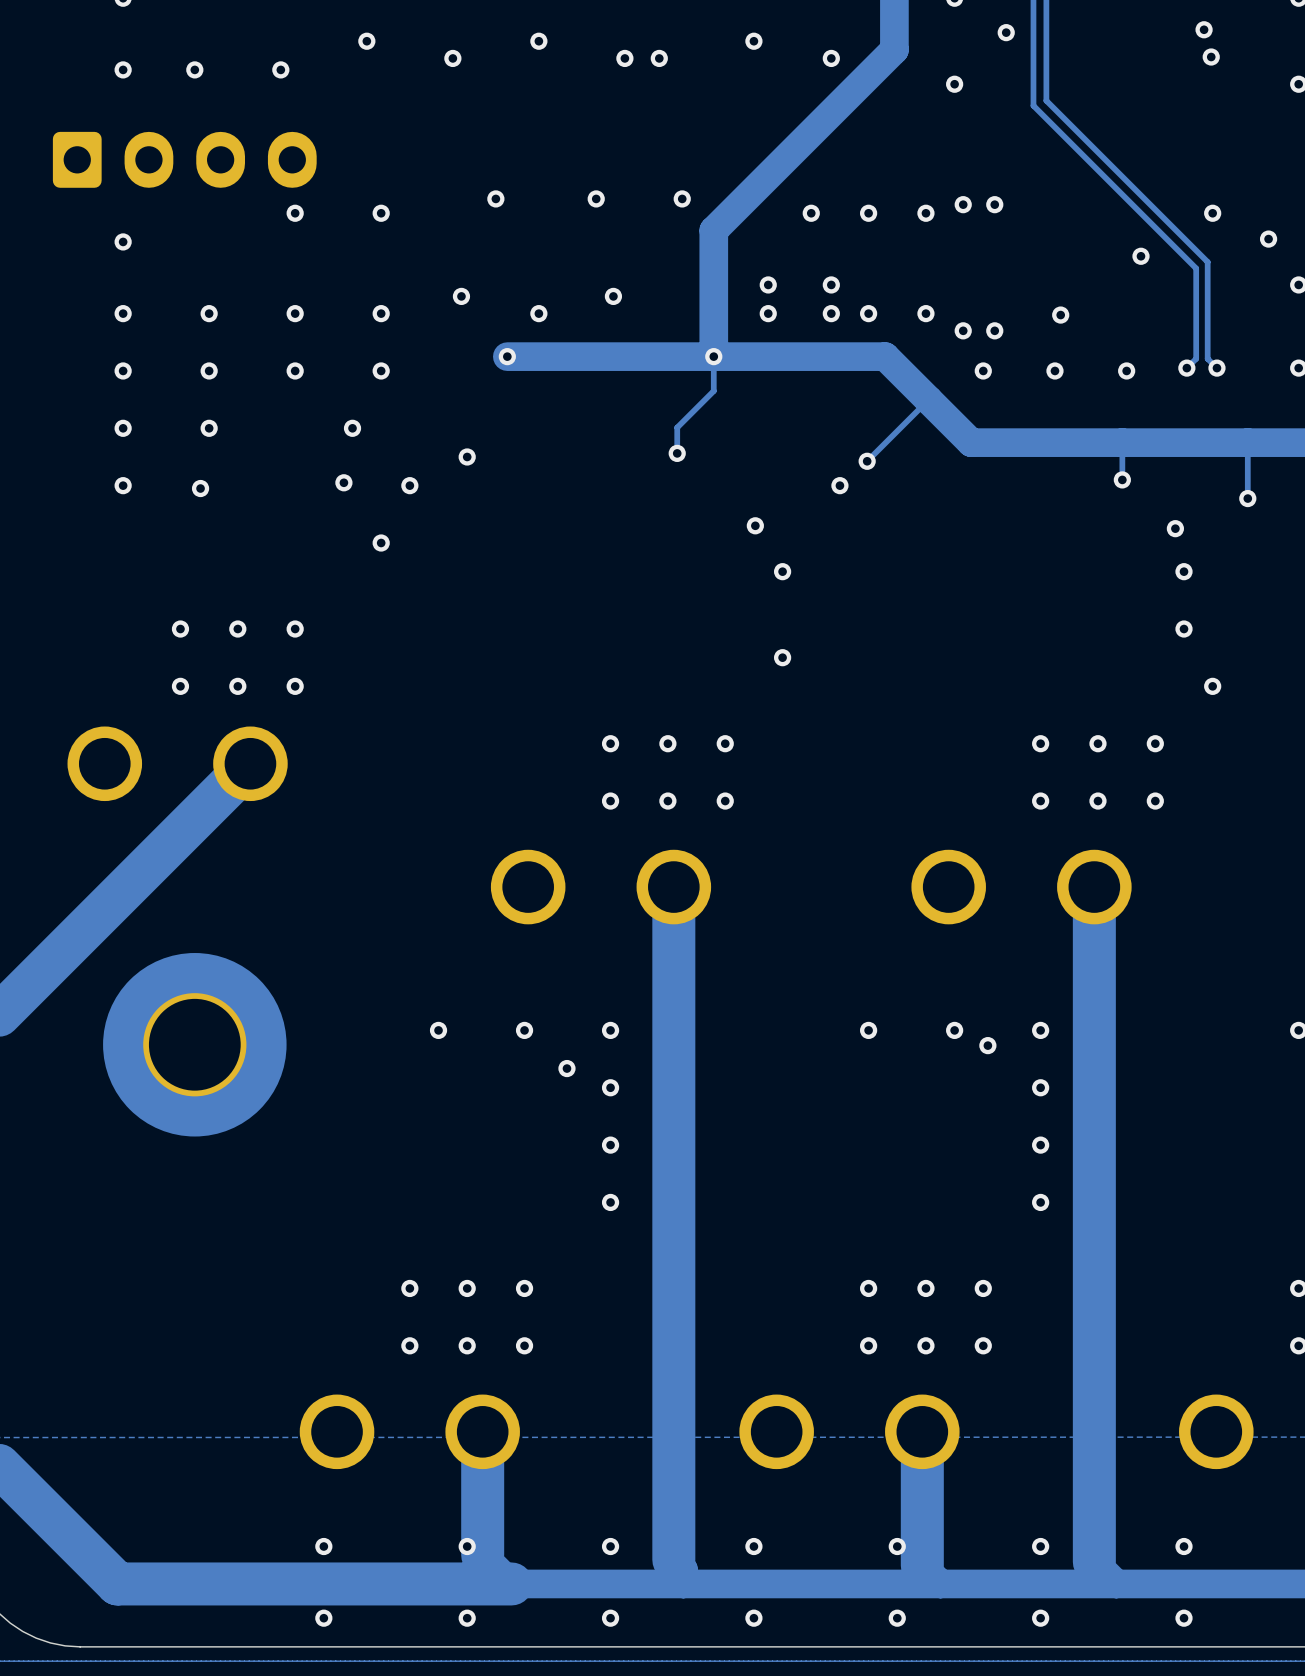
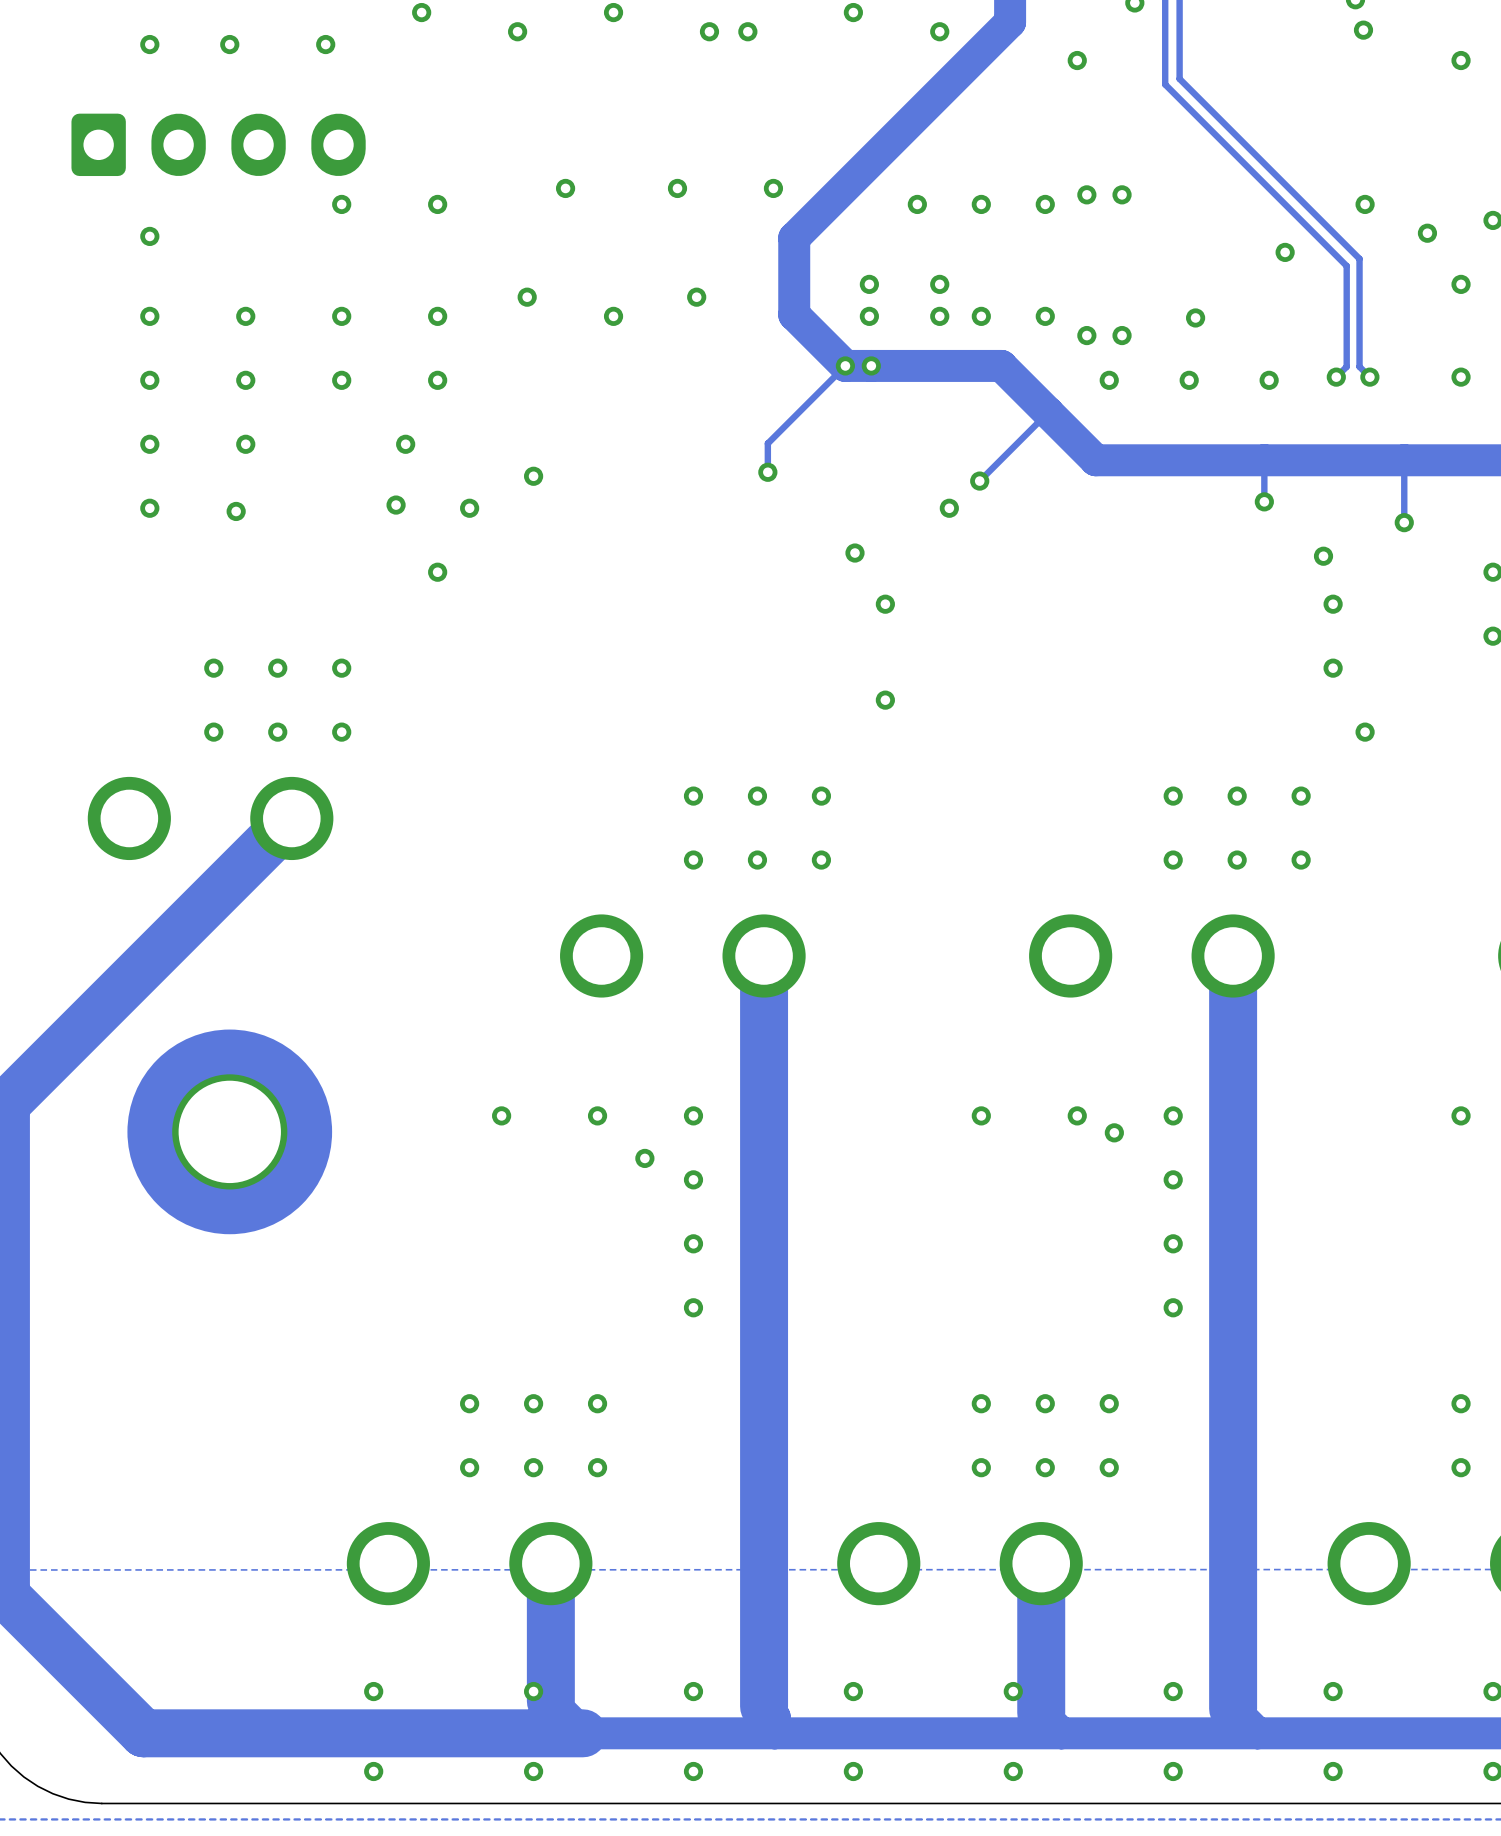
track: (713, 230) (713, 391) -> (808, 223) (794, 238) (794, 314) (845, 365)
track: (507, 356) (886, 358) -> (845, 365) (1001, 365)
via: (507, 356) -> none
via: (713, 356) -> none
track: none -> (845, 365) (808, 402)
via: none -> (845, 365)
via: none -> (871, 365)

